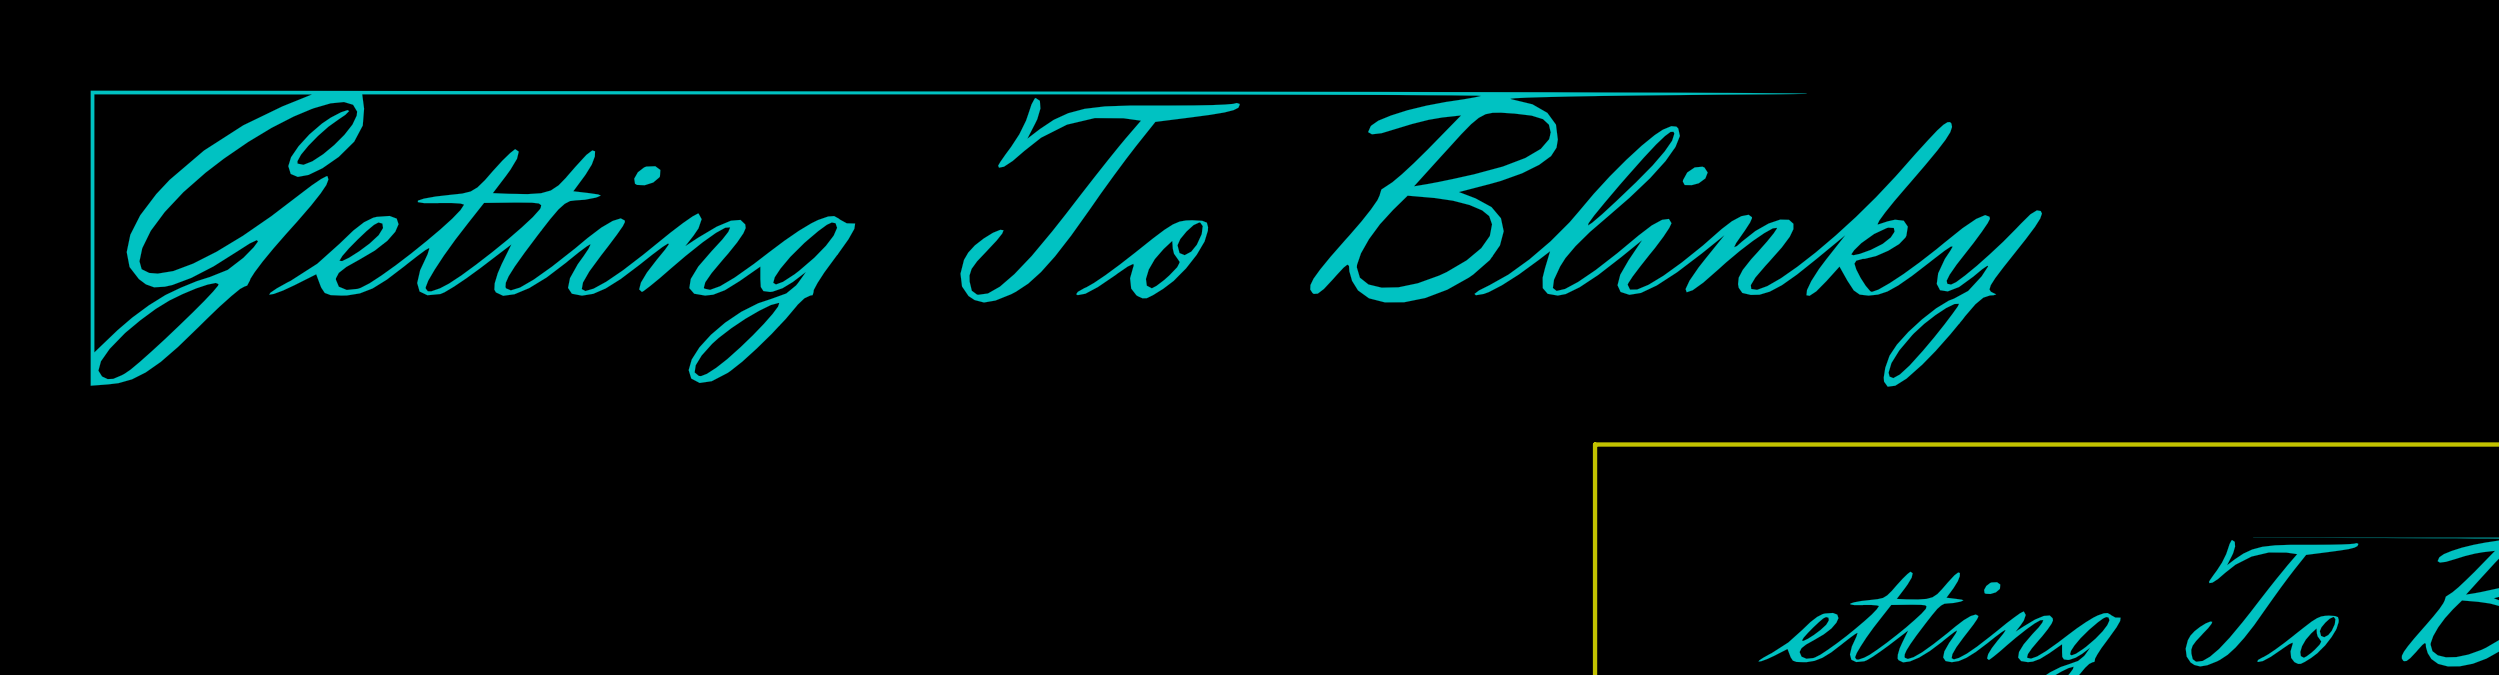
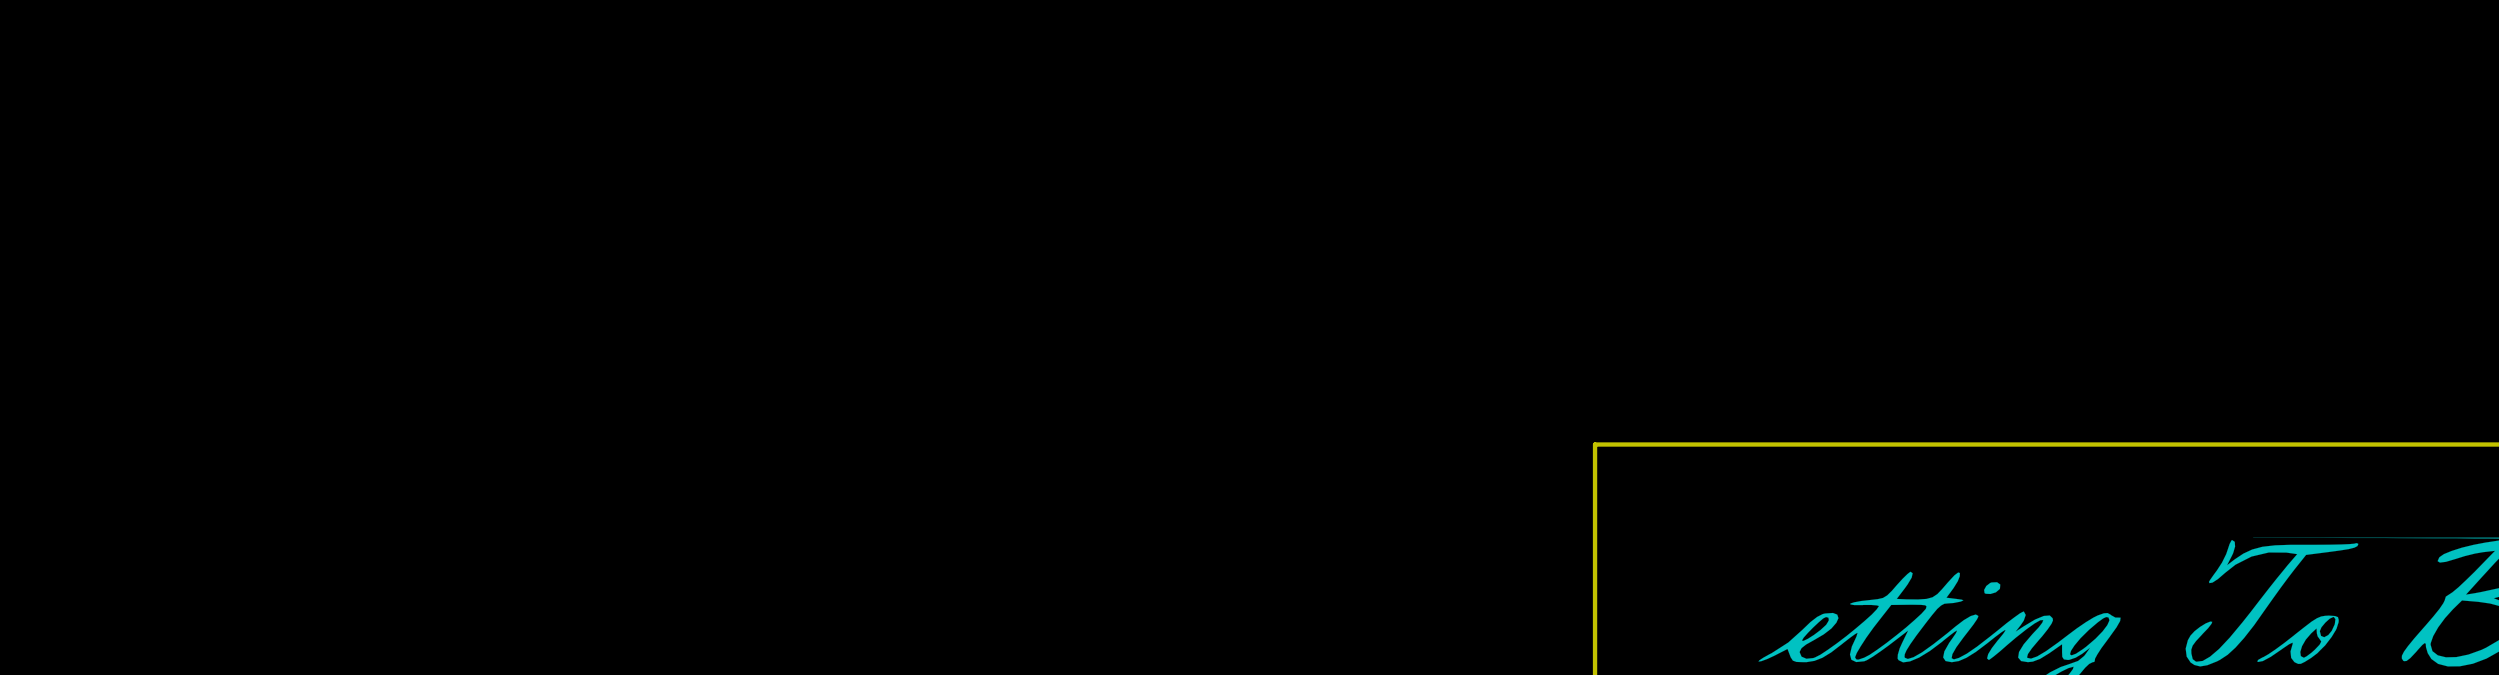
drawing: [90, 90, 2042, 387] -> none

